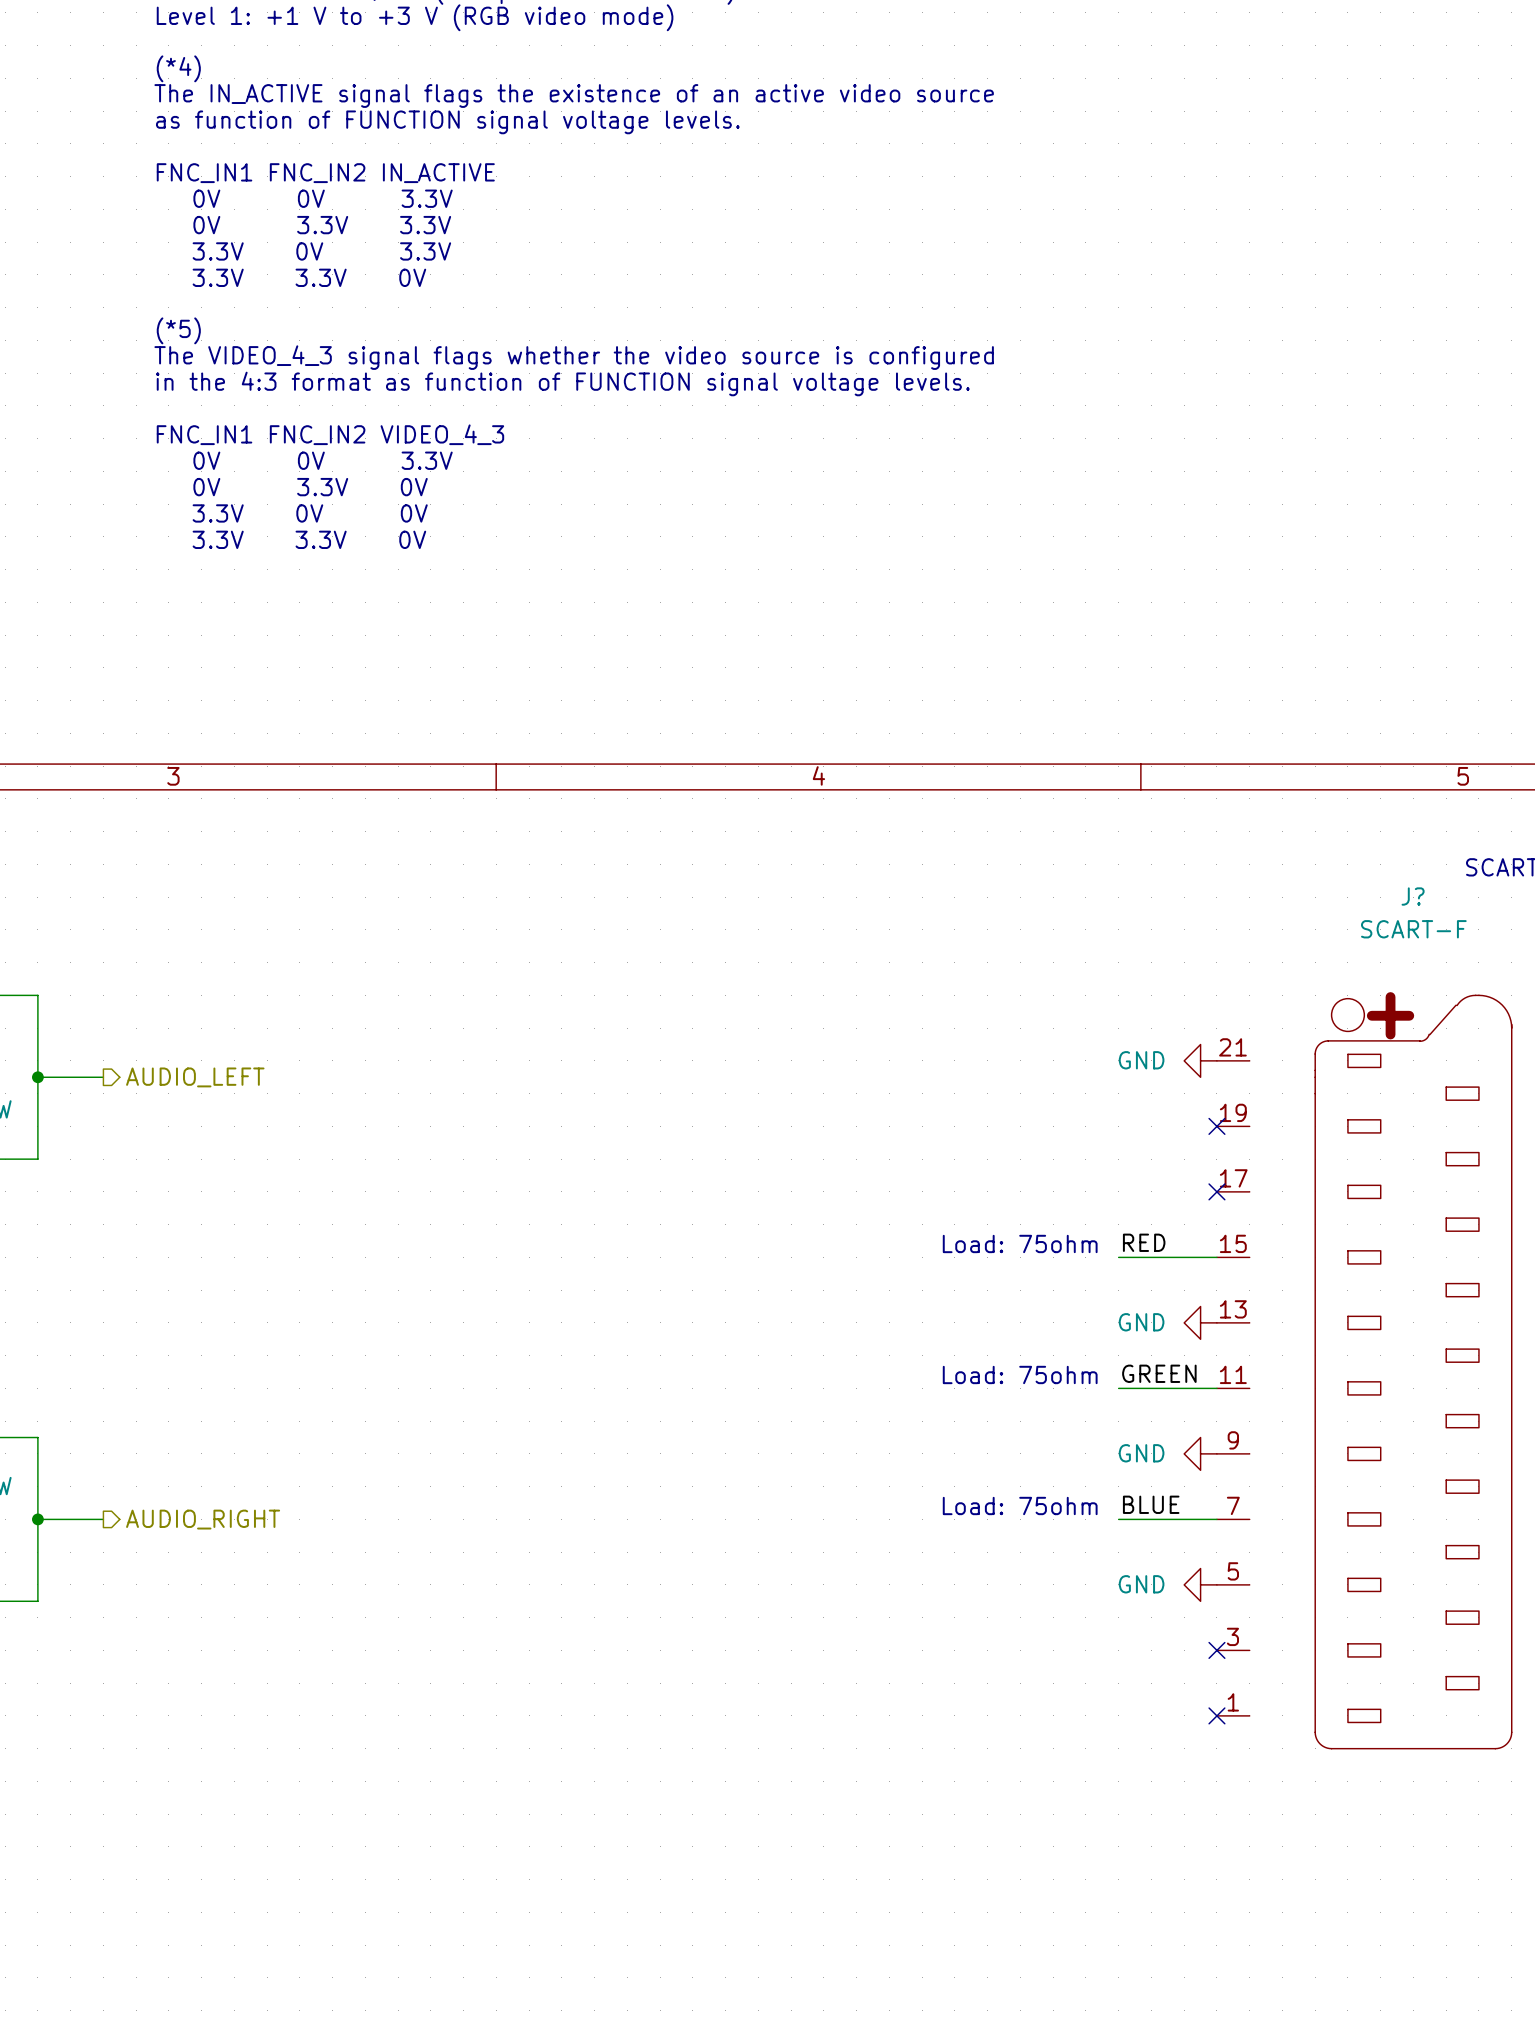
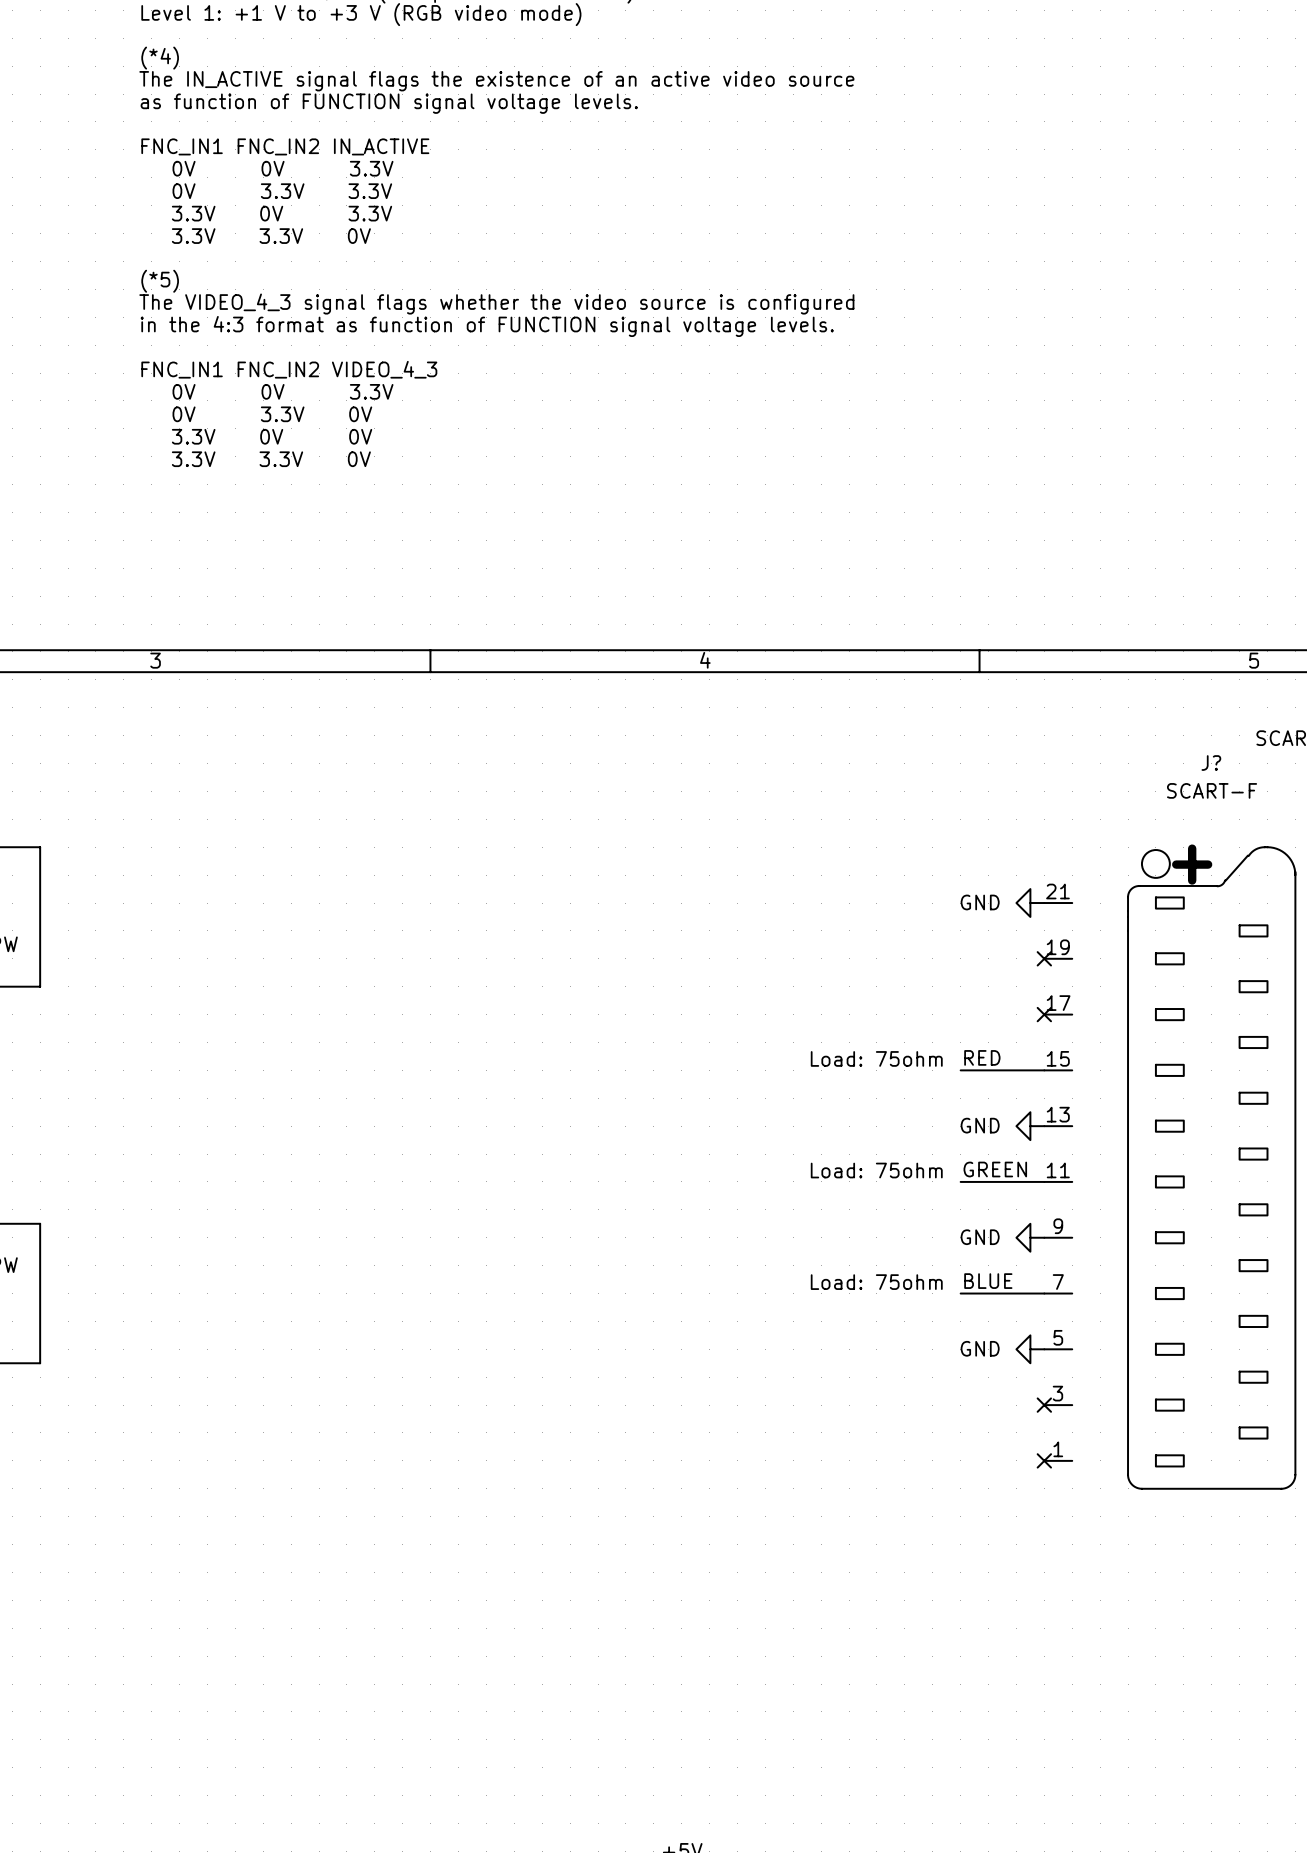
wire: (37, 1077) (103, 1077) -> none
junction: (37, 1077) -> none
hierarchical label: AUDIO_LEFT (195, 1077) -> none
wire: (37, 1519) (103, 1519) -> none
junction: (37, 1519) -> none
hierarchical label: AUDIO_RIGHT (203, 1519) -> none

